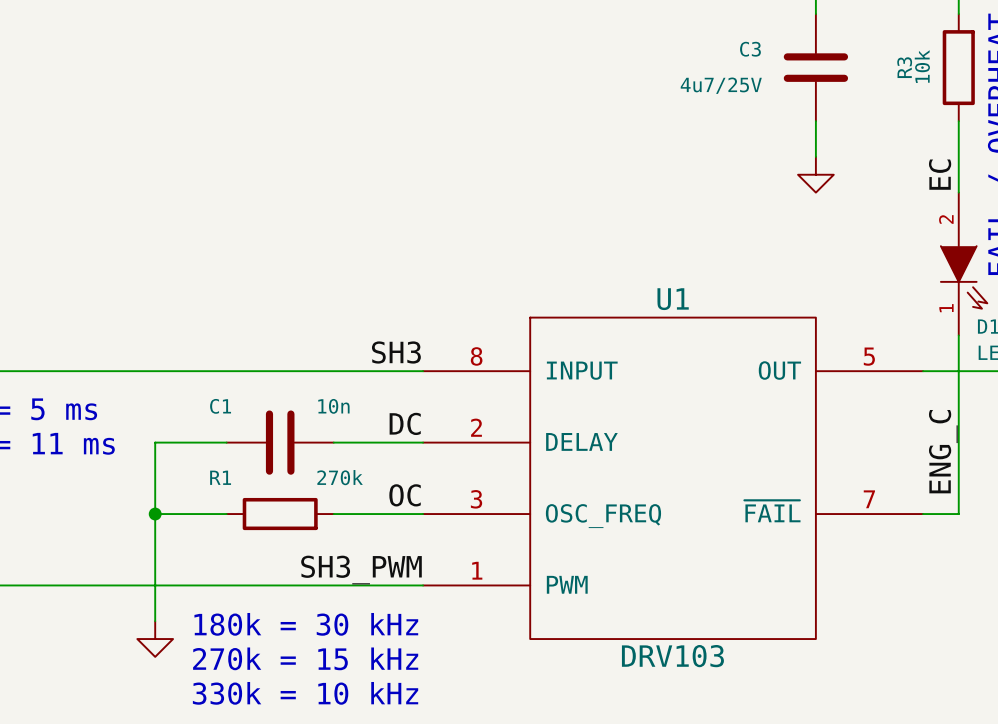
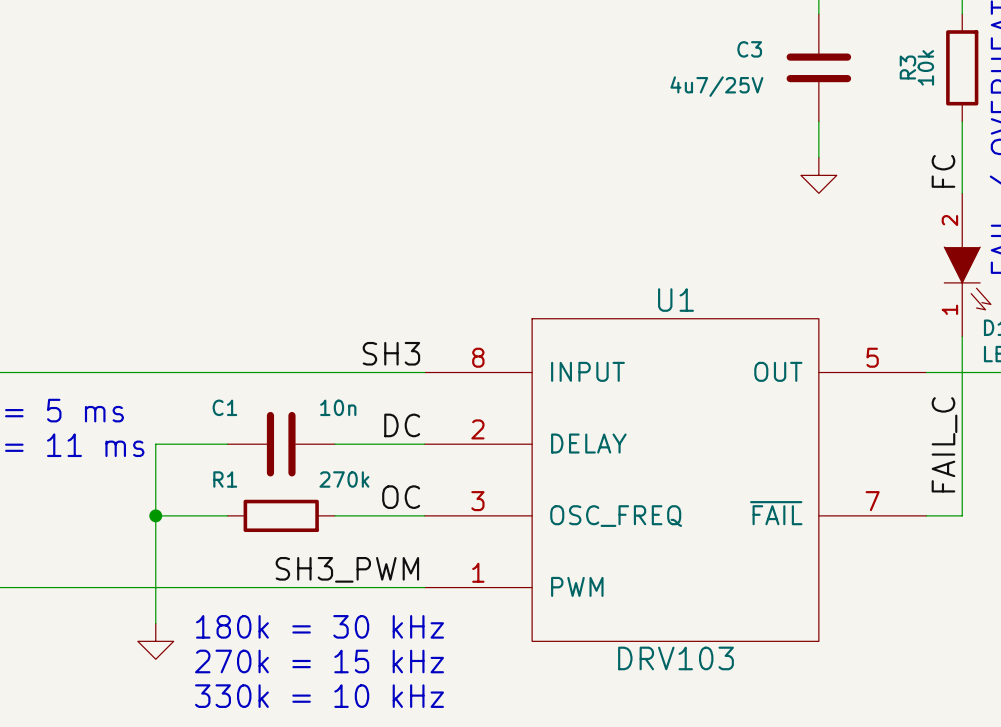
label: EC (940, 174) -> FC (943, 171)
label: ENG_C (943, 451) -> FAIL_C (944, 444)

